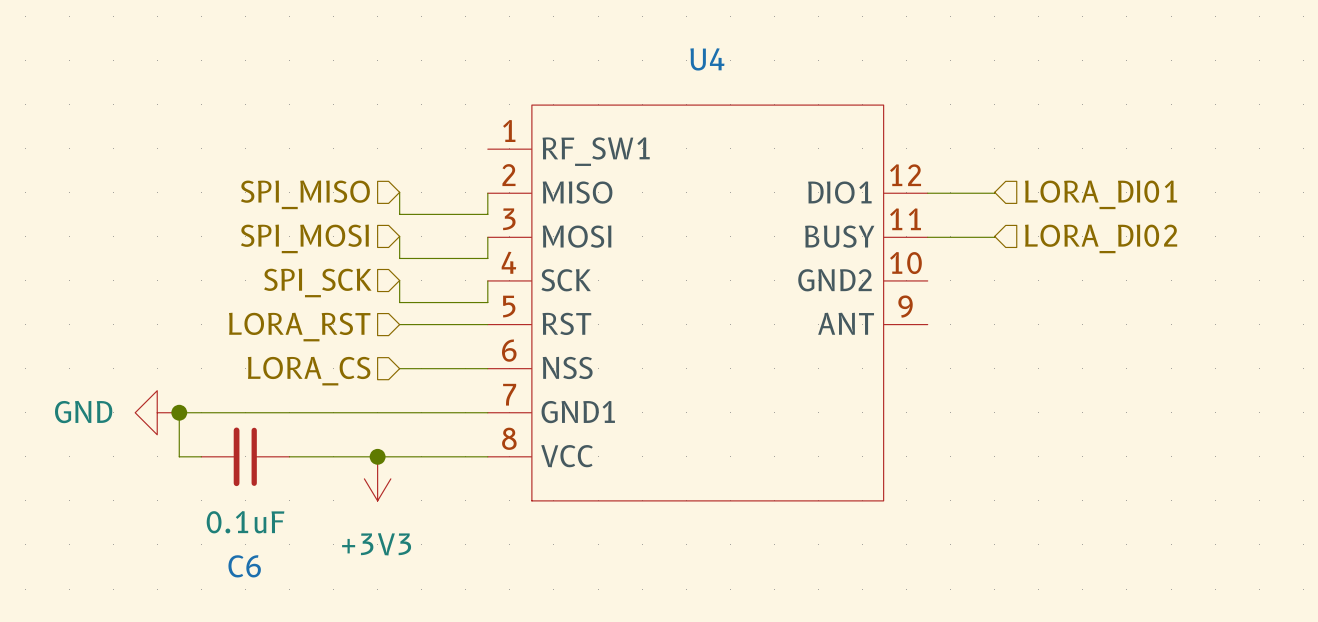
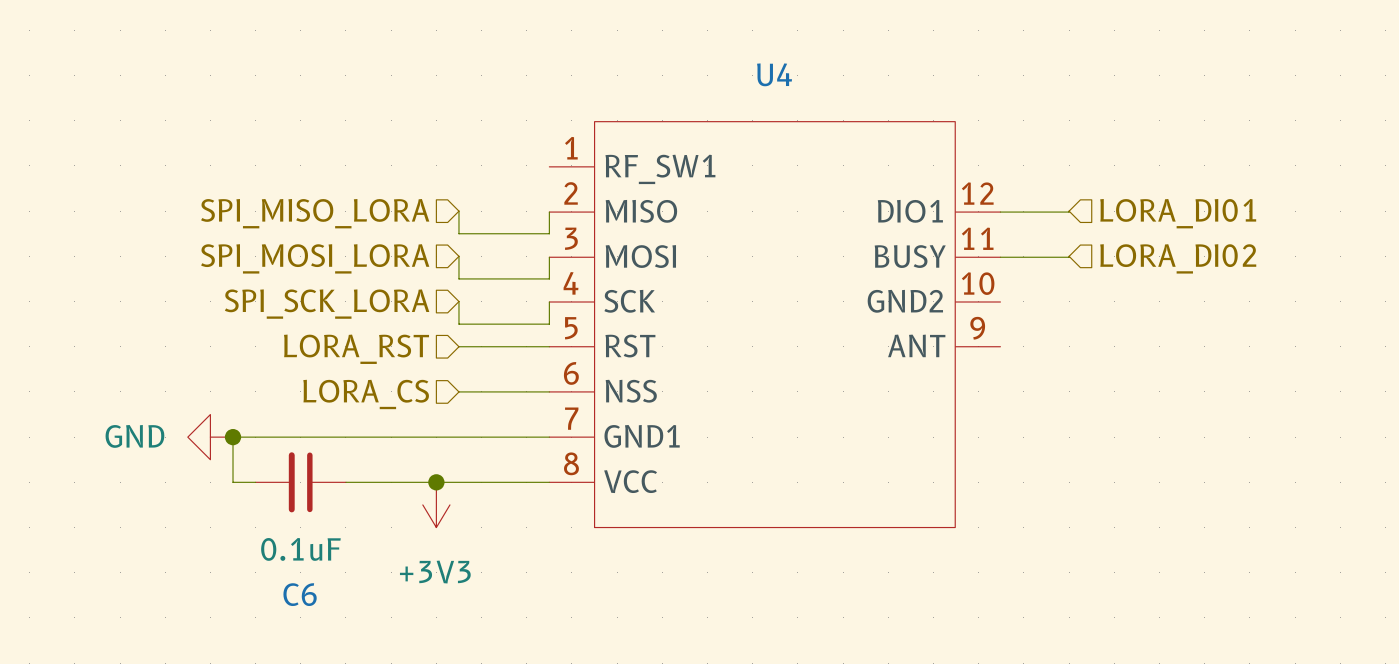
hierarchical label: SPI_MISO (305, 194) -> SPI_MISO_LORA (315, 213)
hierarchical label: SPI_MOSI (304, 238) -> SPI_MOSI_LORA (315, 258)
hierarchical label: SPI_SCK (317, 282) -> SPI_SCK_LORA (327, 304)

